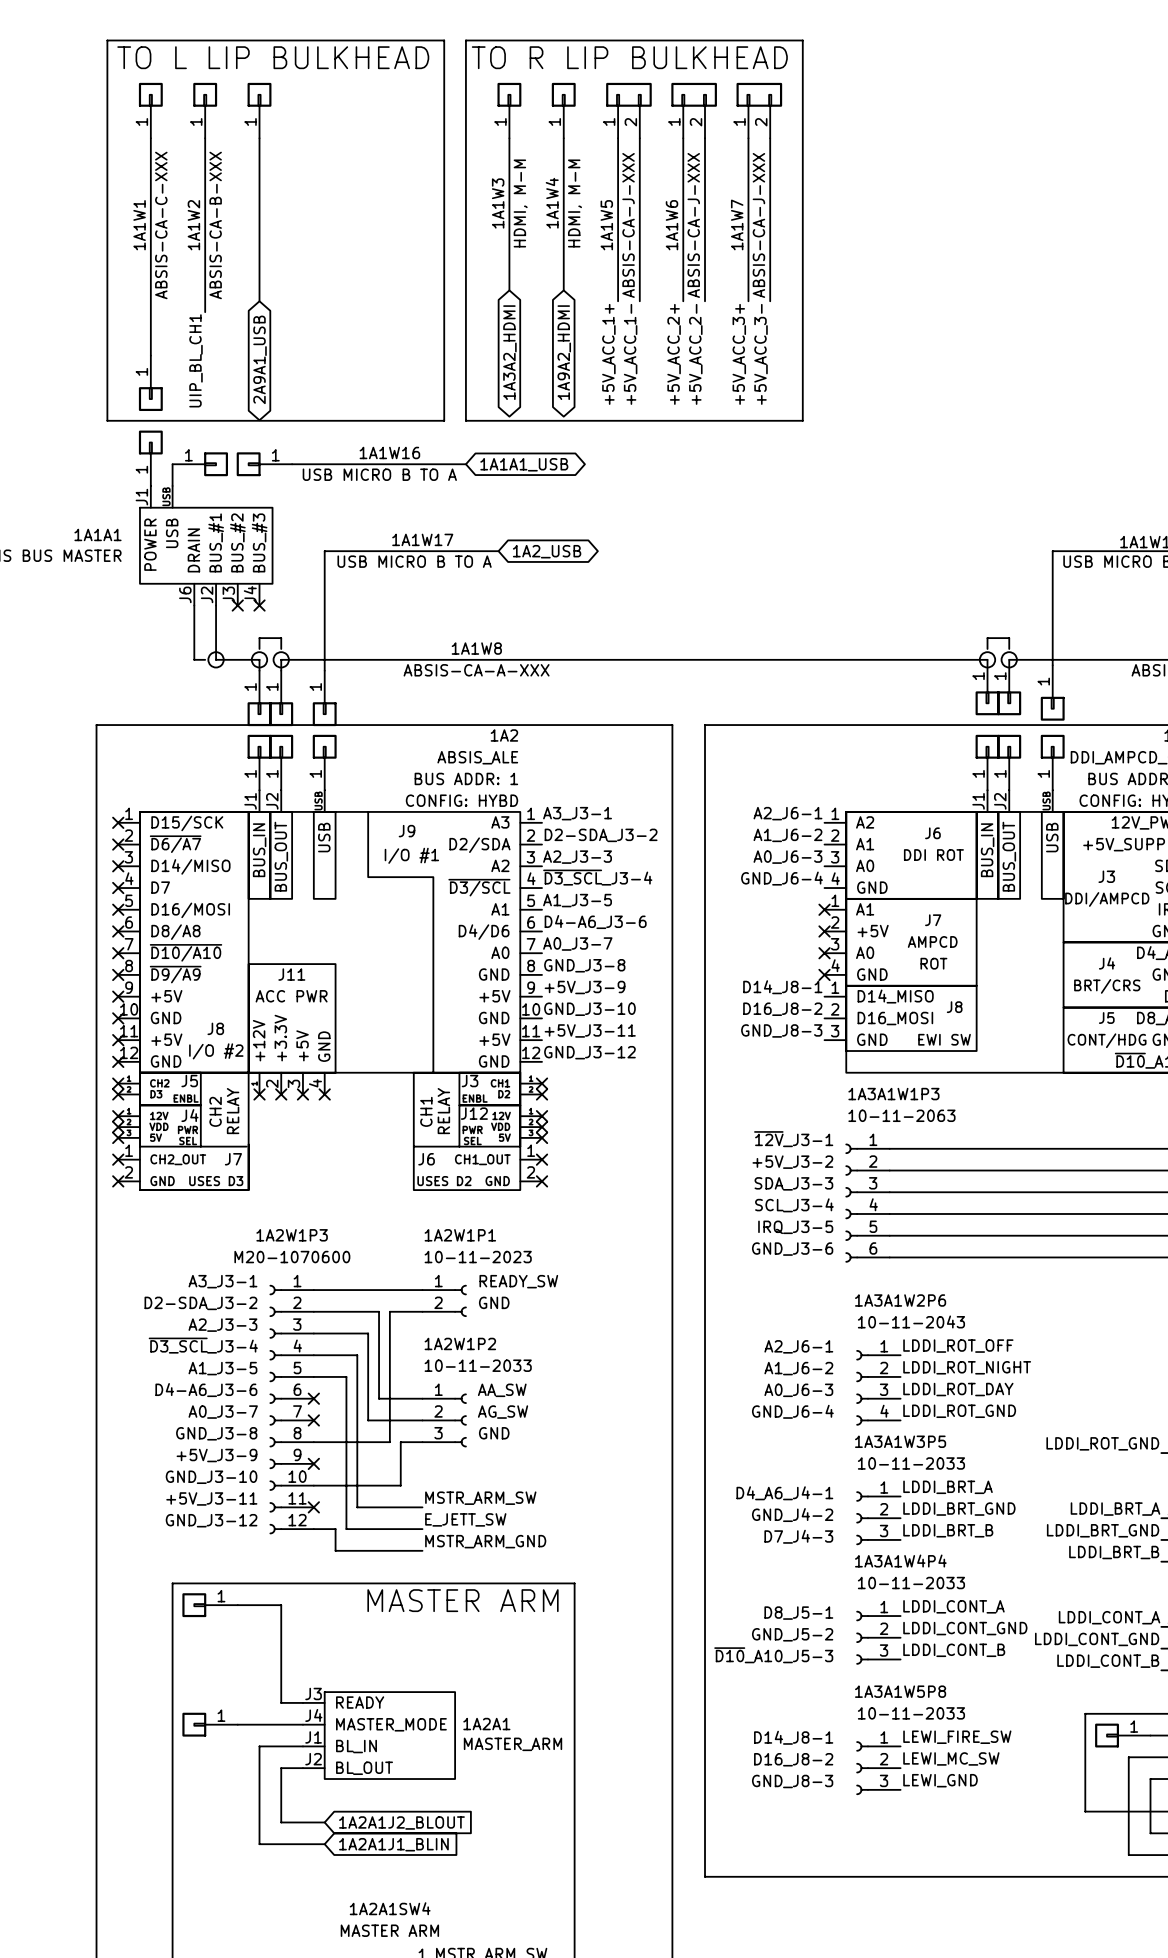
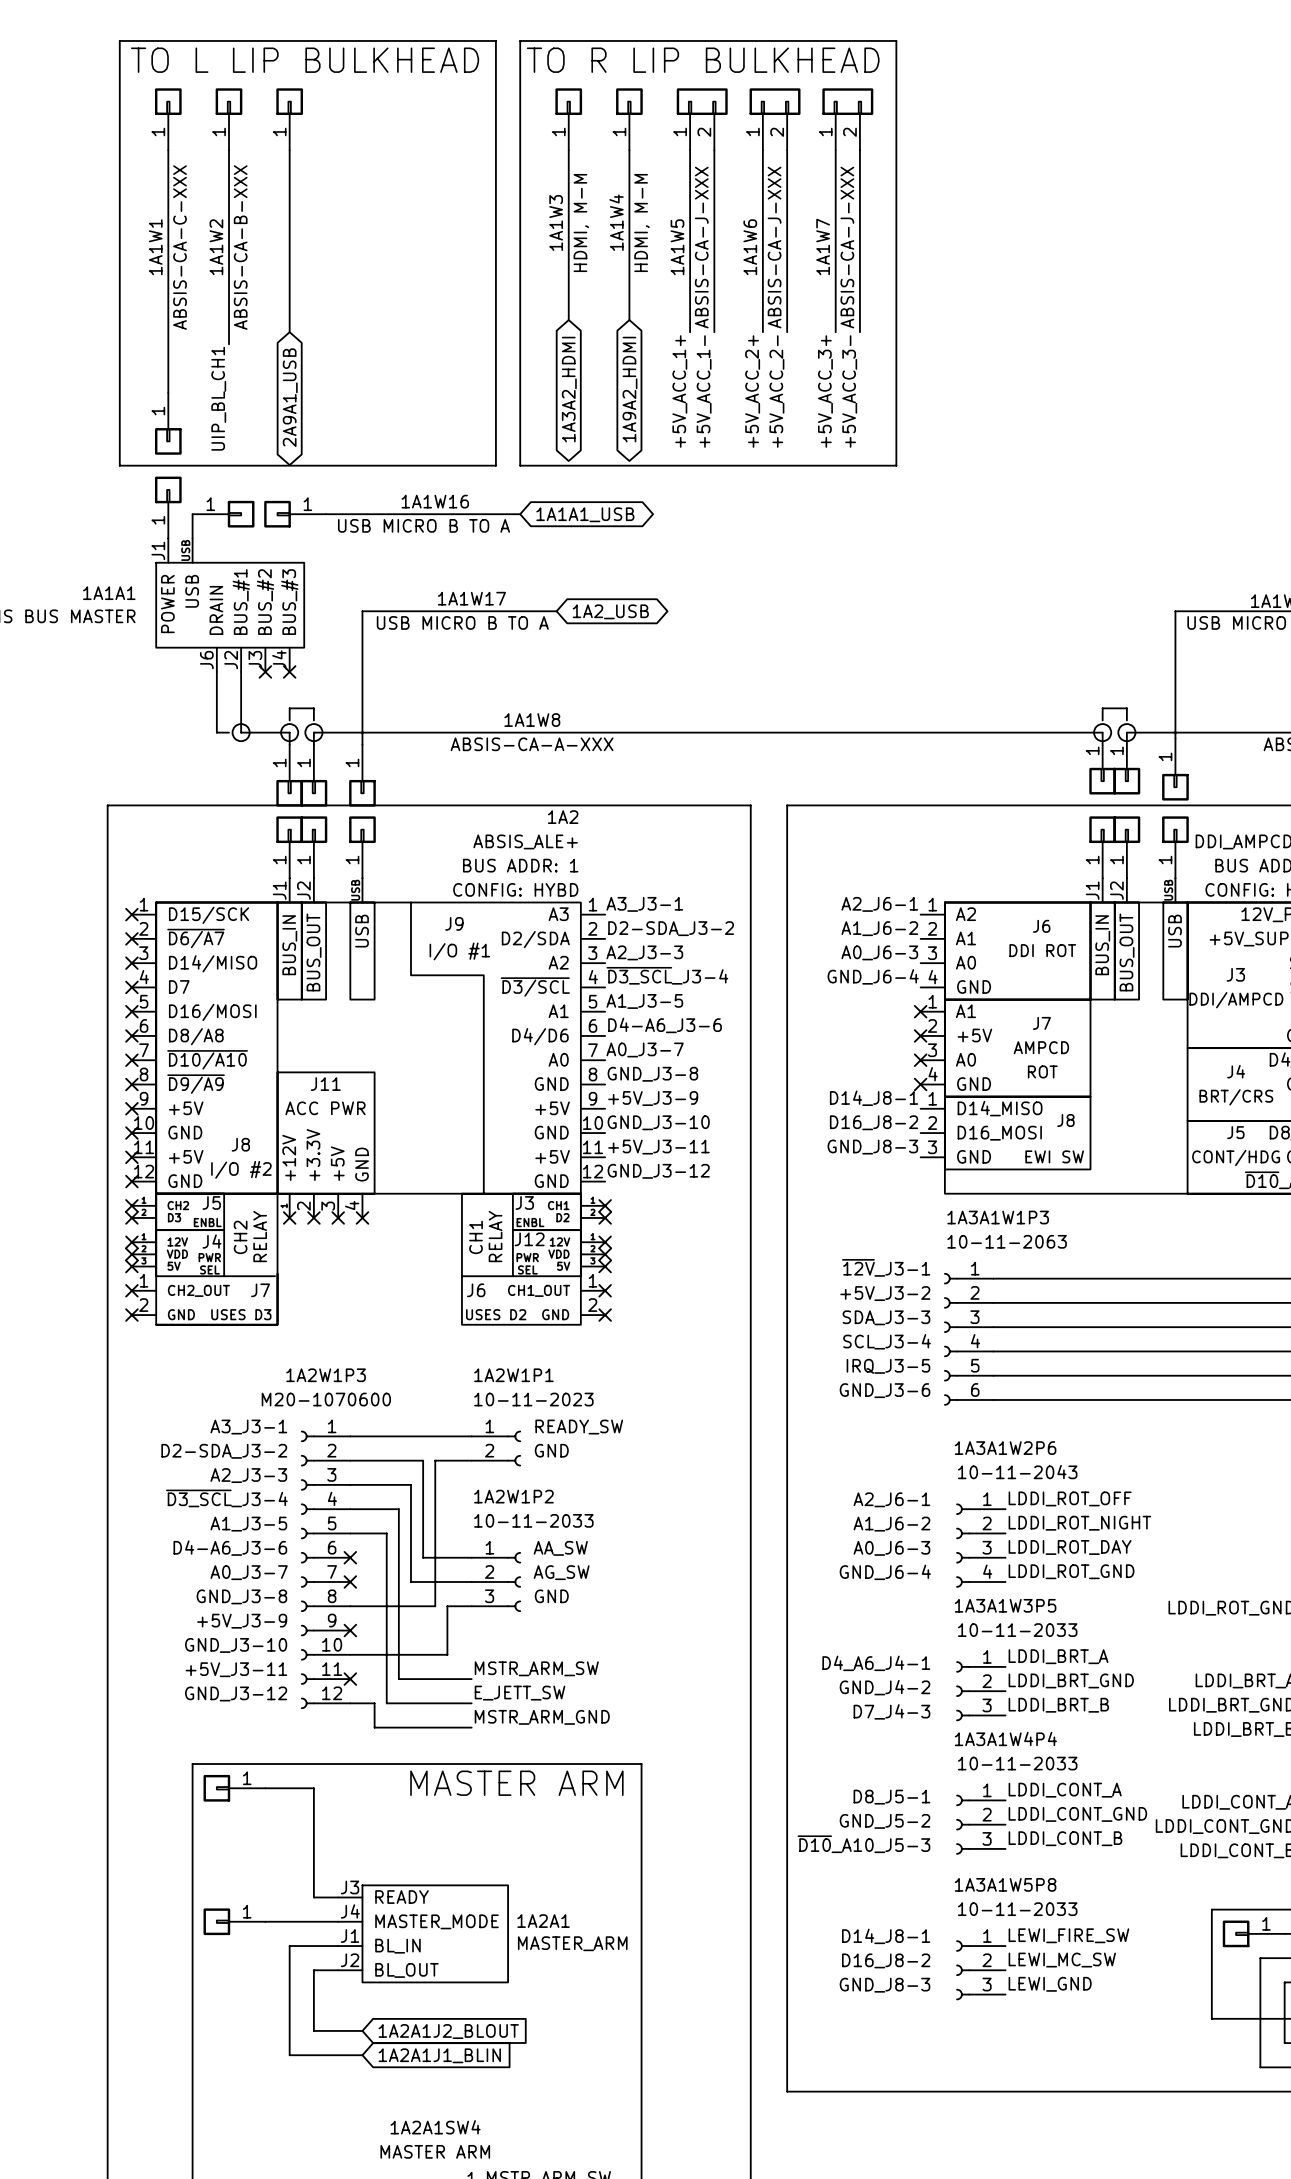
1A2 value: ABSIS_ALE (477, 757) -> ABSIS_ALE+ (525, 841)

